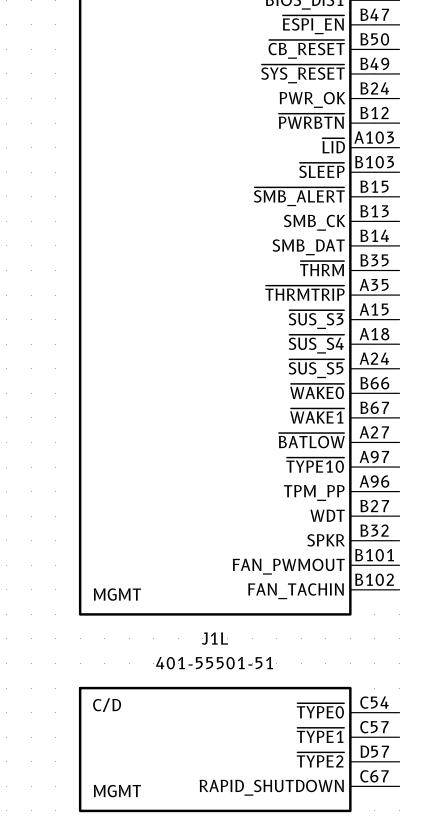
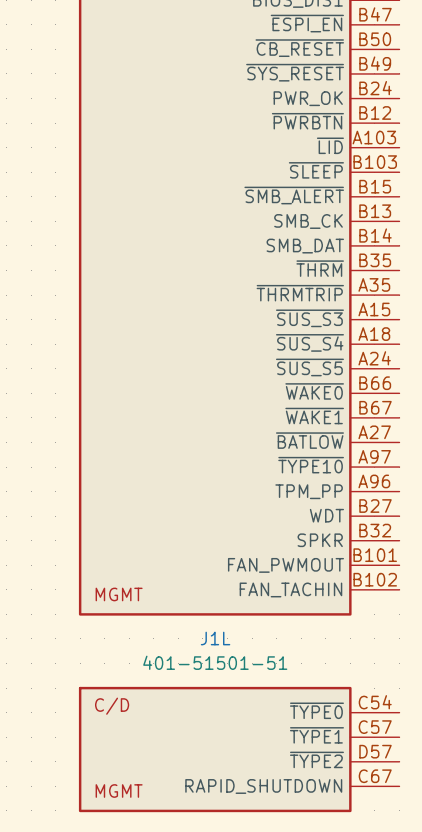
J1L text: 401-55501-51 (214, 663) -> 401-51501-51 (215, 662)

